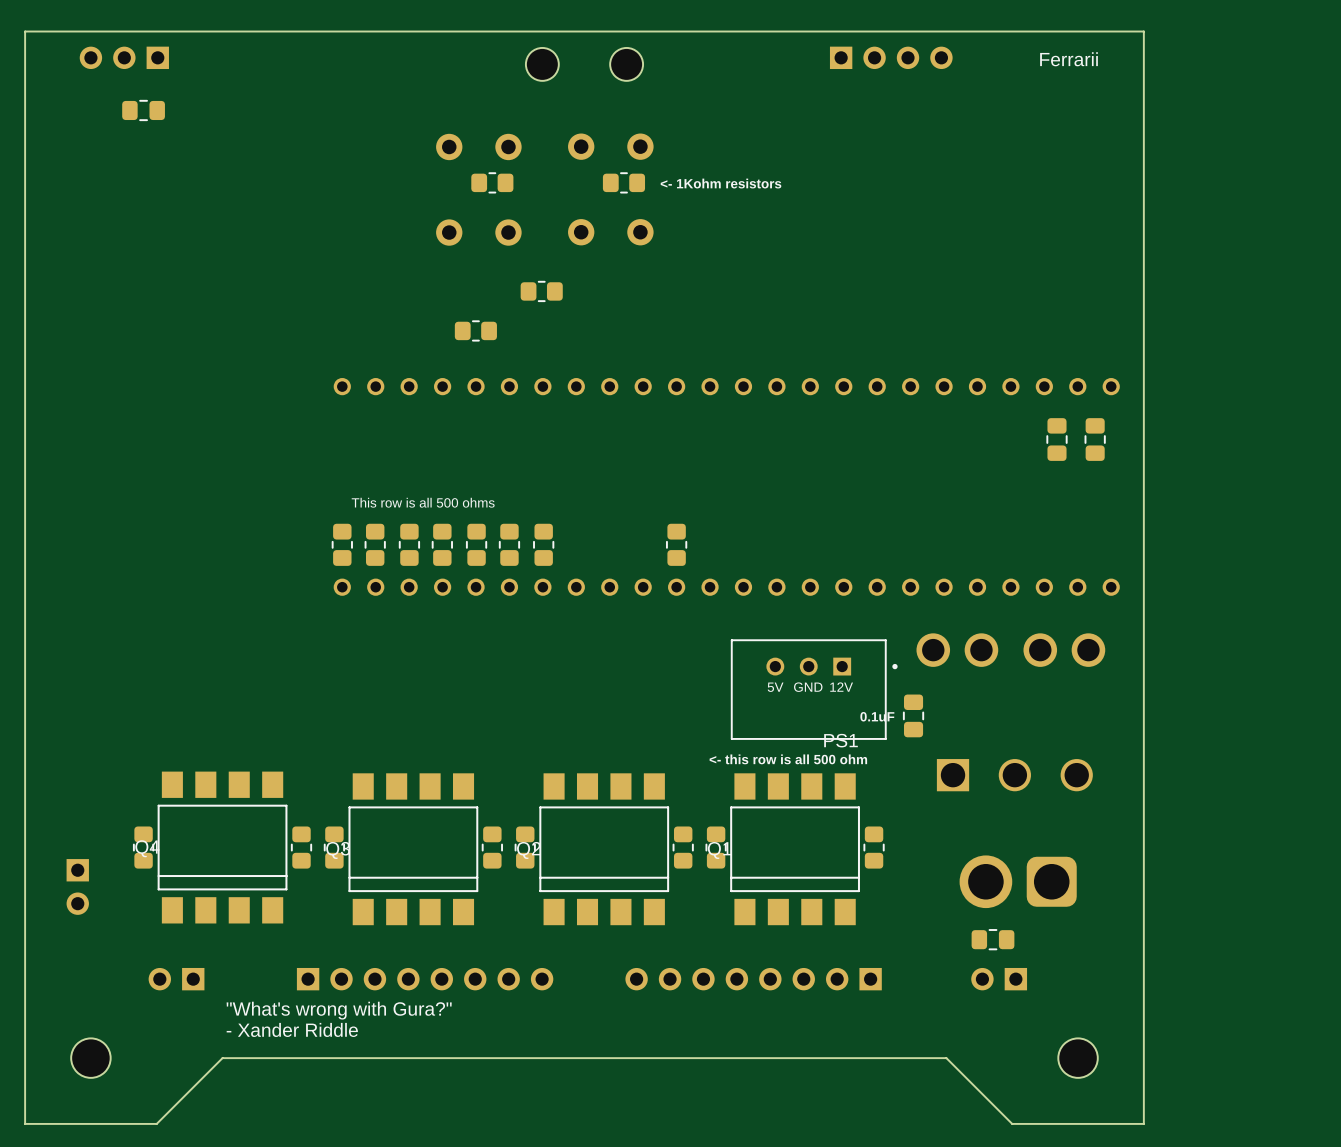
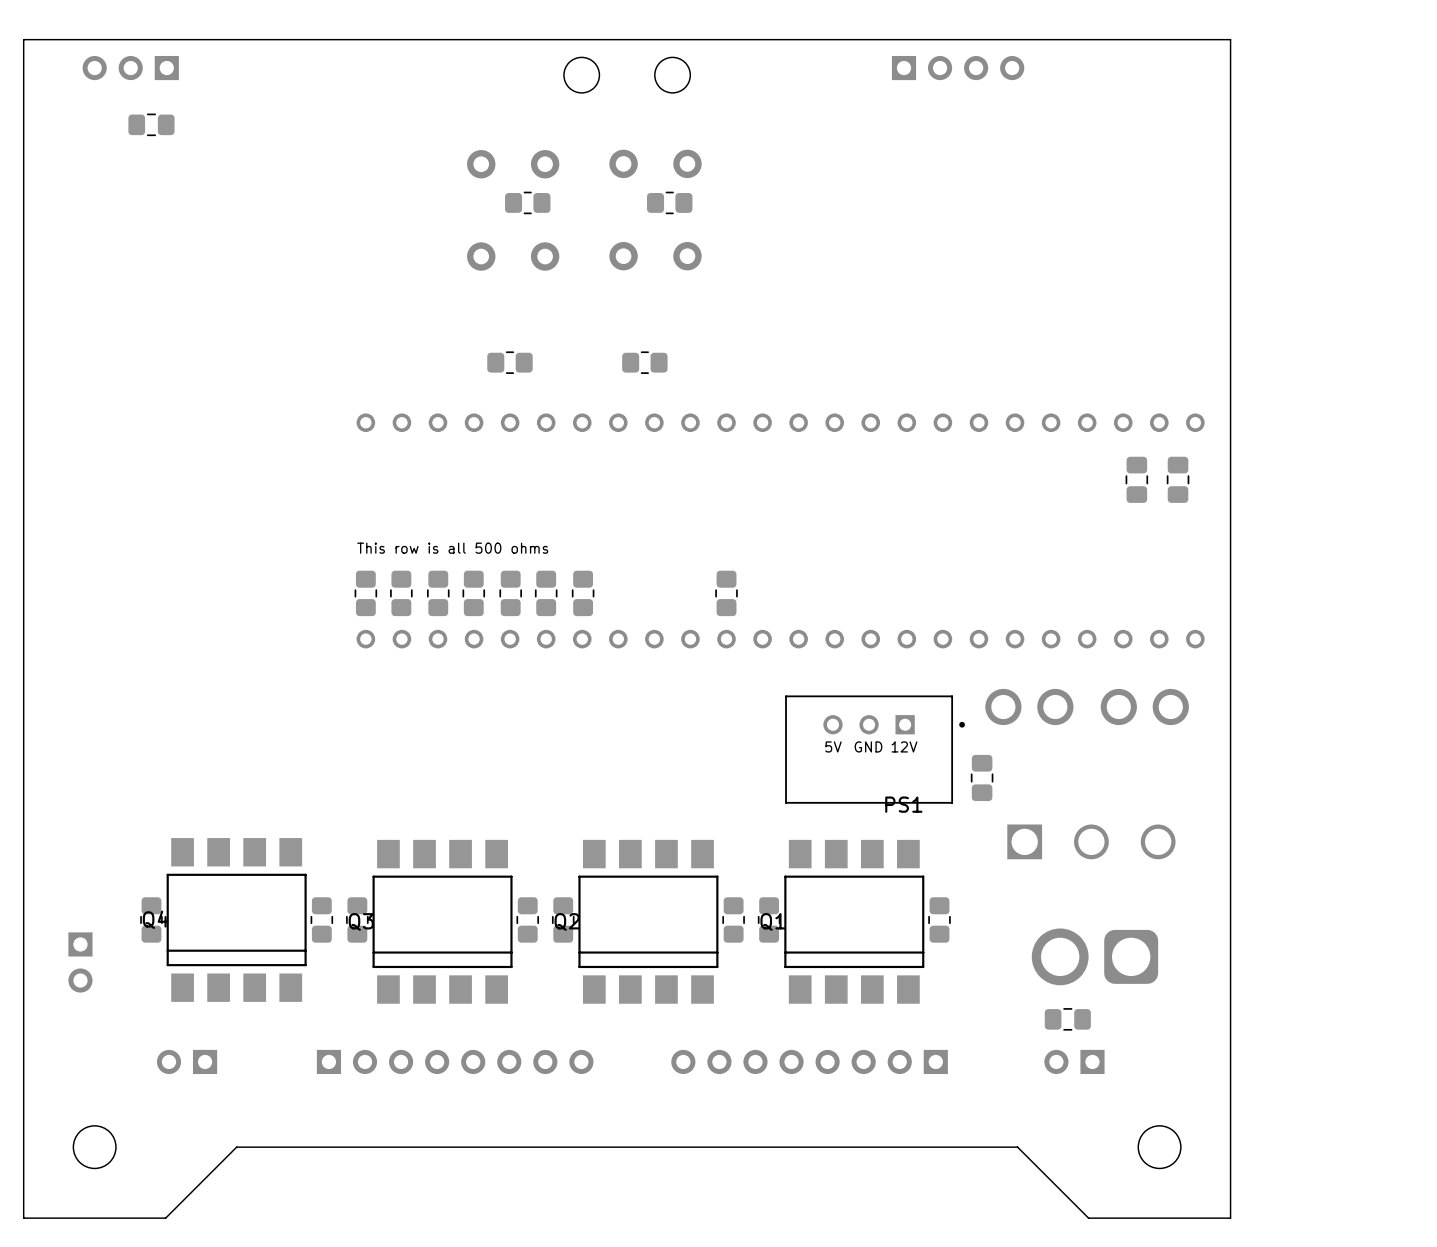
text: Ferrarii (1069, 59) -> none
text: <- 1Kohm resistors (721, 183) -> none
part position: (541, 291) -> (644, 362)
text: 0.1uF (877, 716) -> none
text: <- this row is all 500 ohm (788, 759) -> none
text: "What's wrong with Gura?" (339, 1010) -> none
text: - Xander Riddle (292, 1029) -> none

